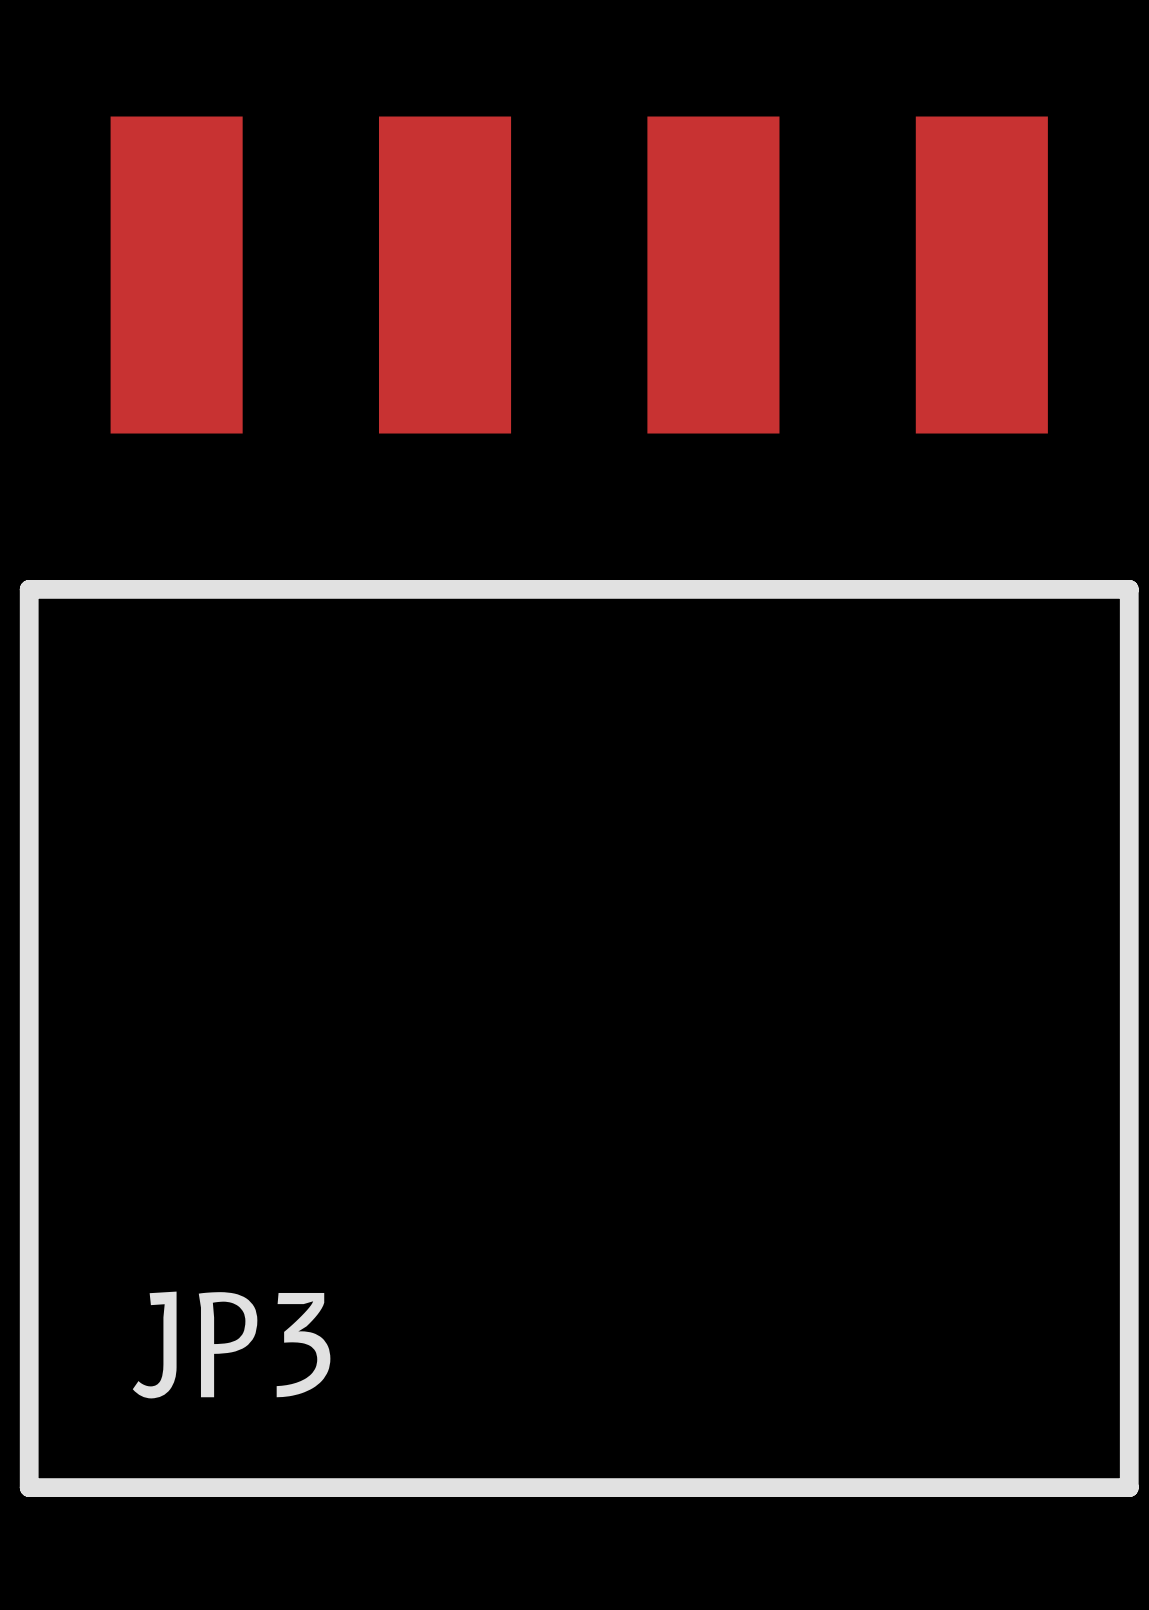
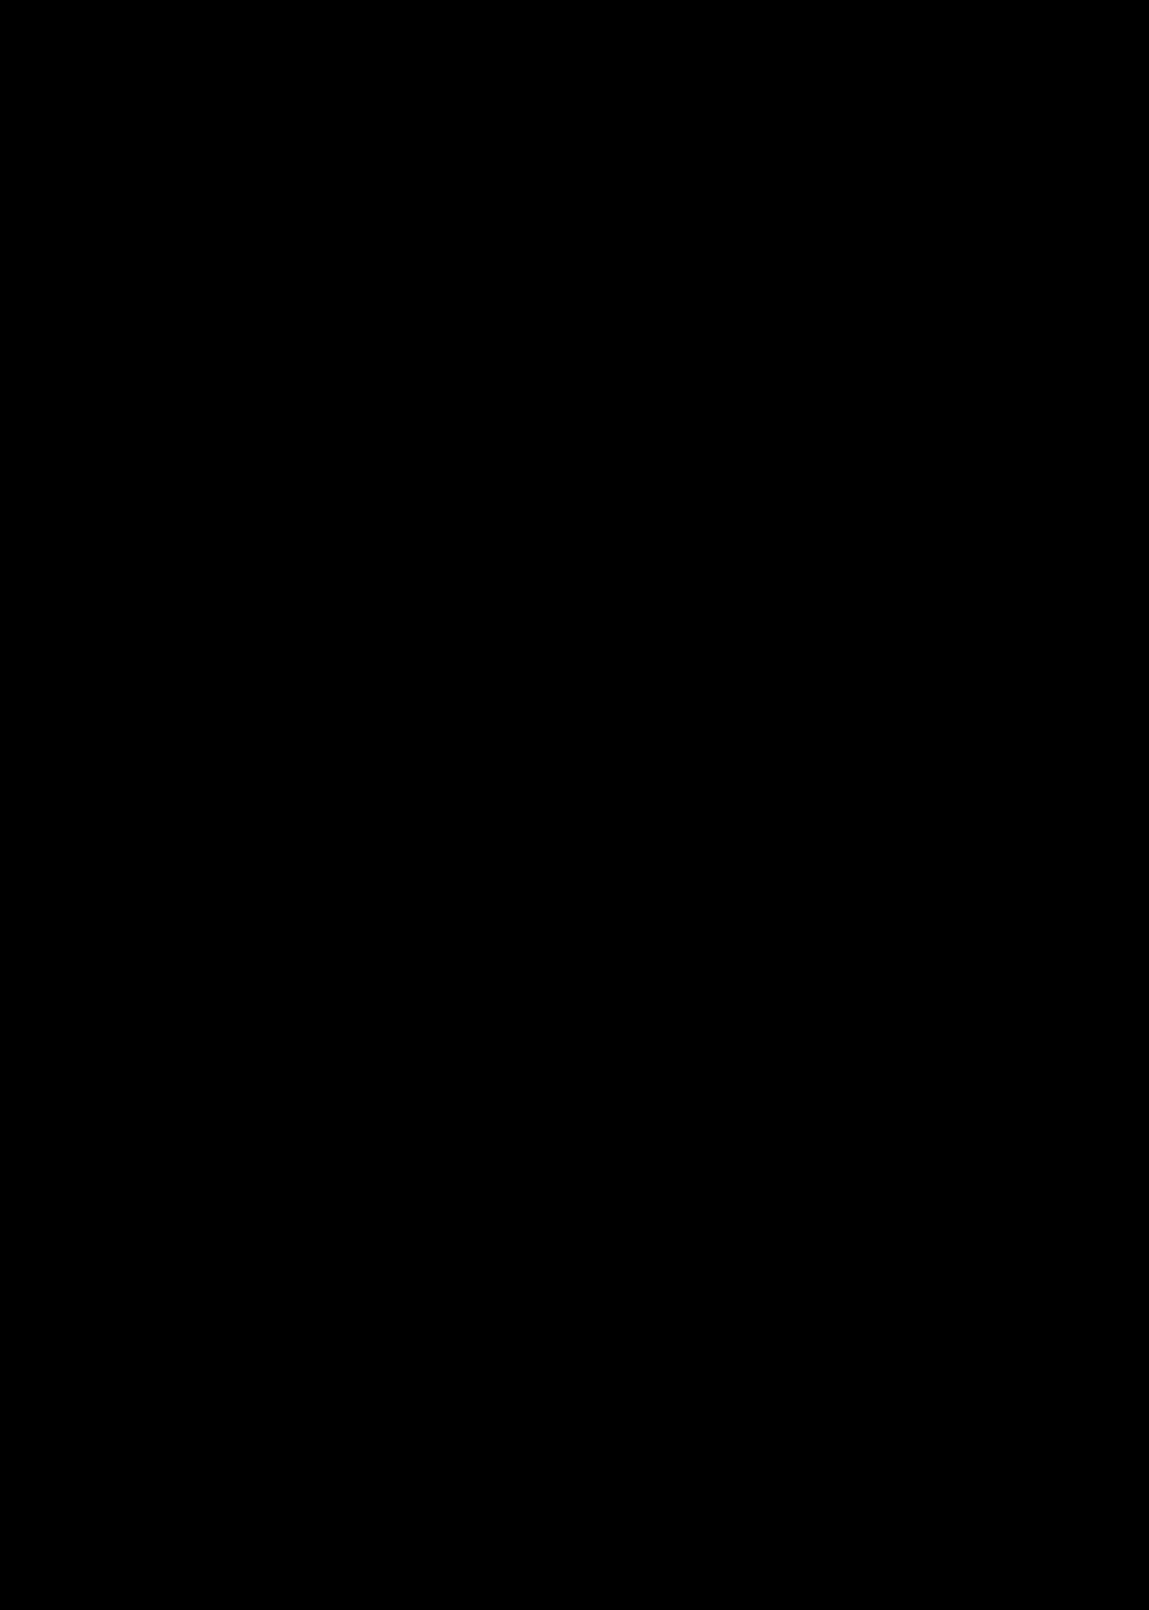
JP3: (579, 806) -> none

